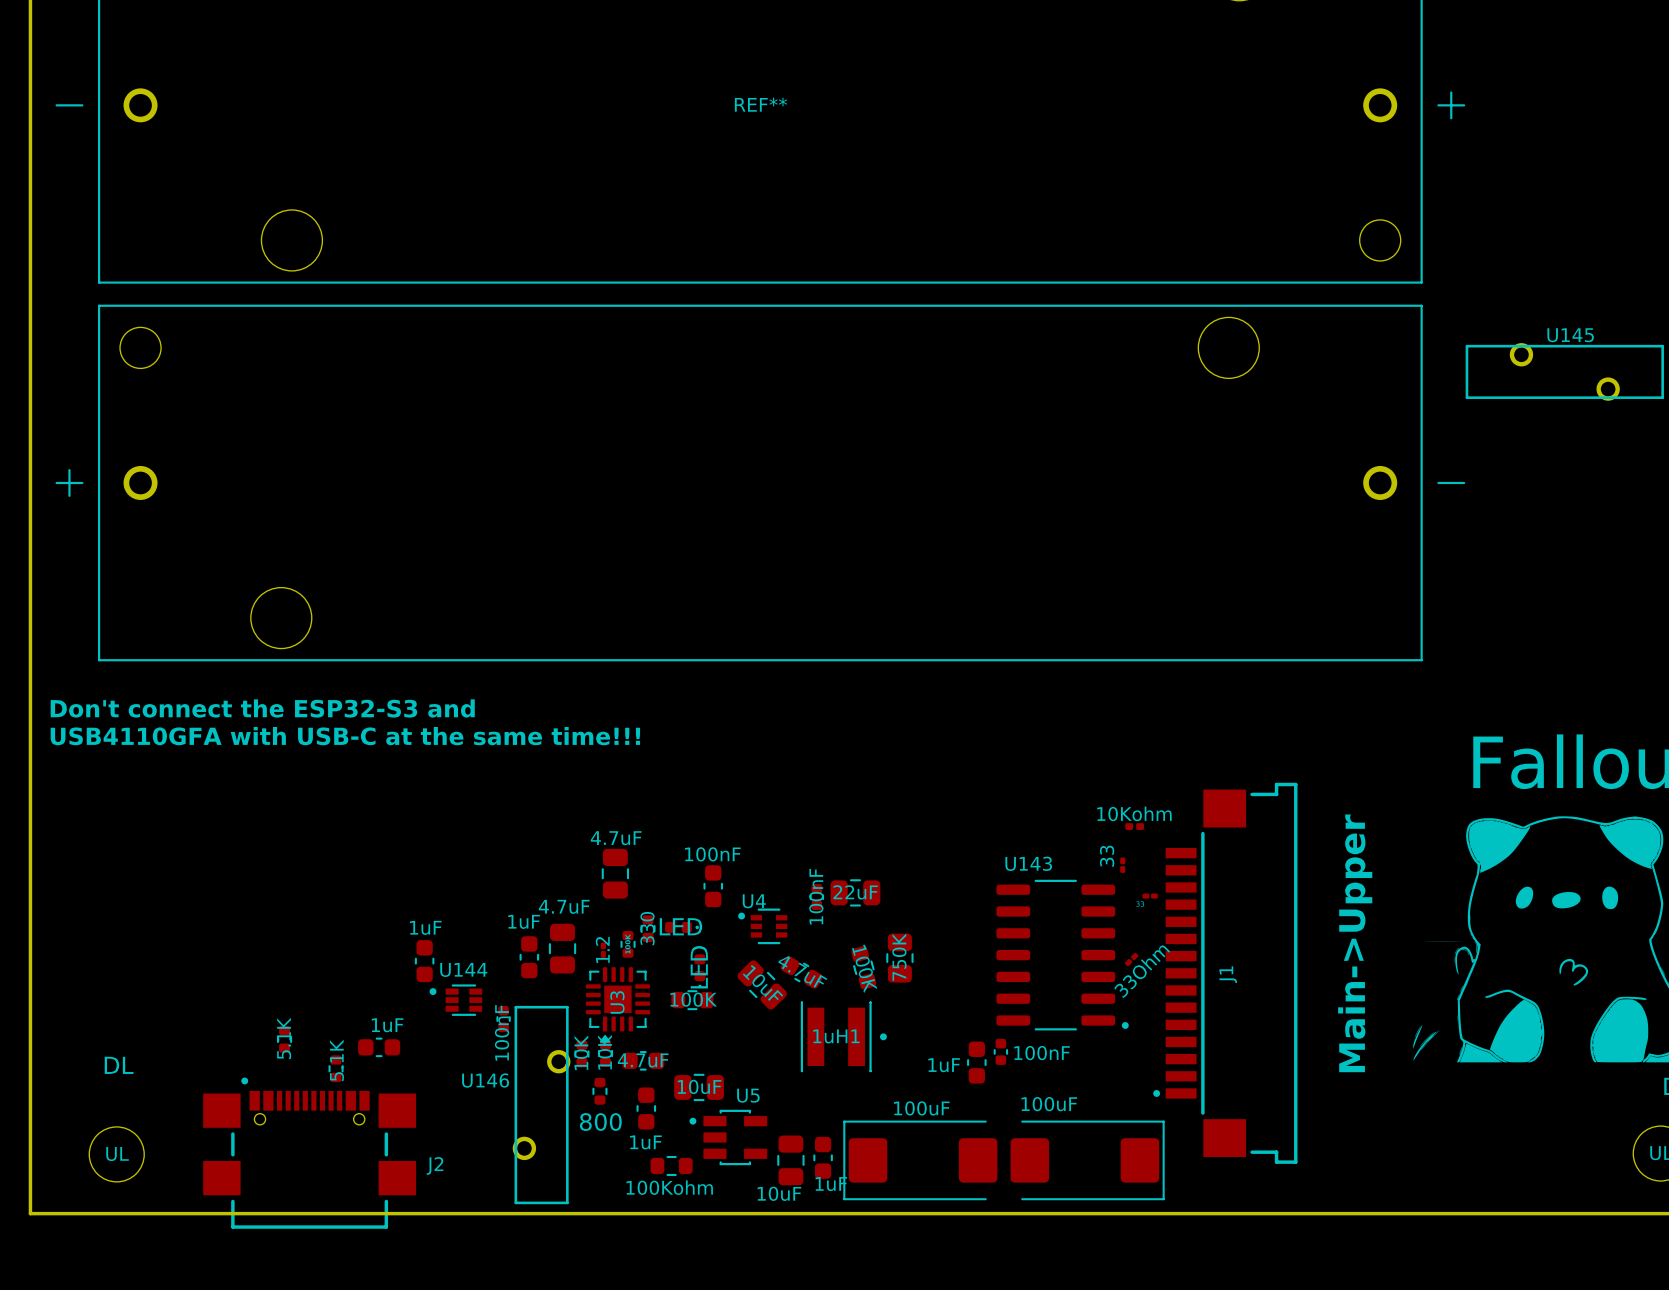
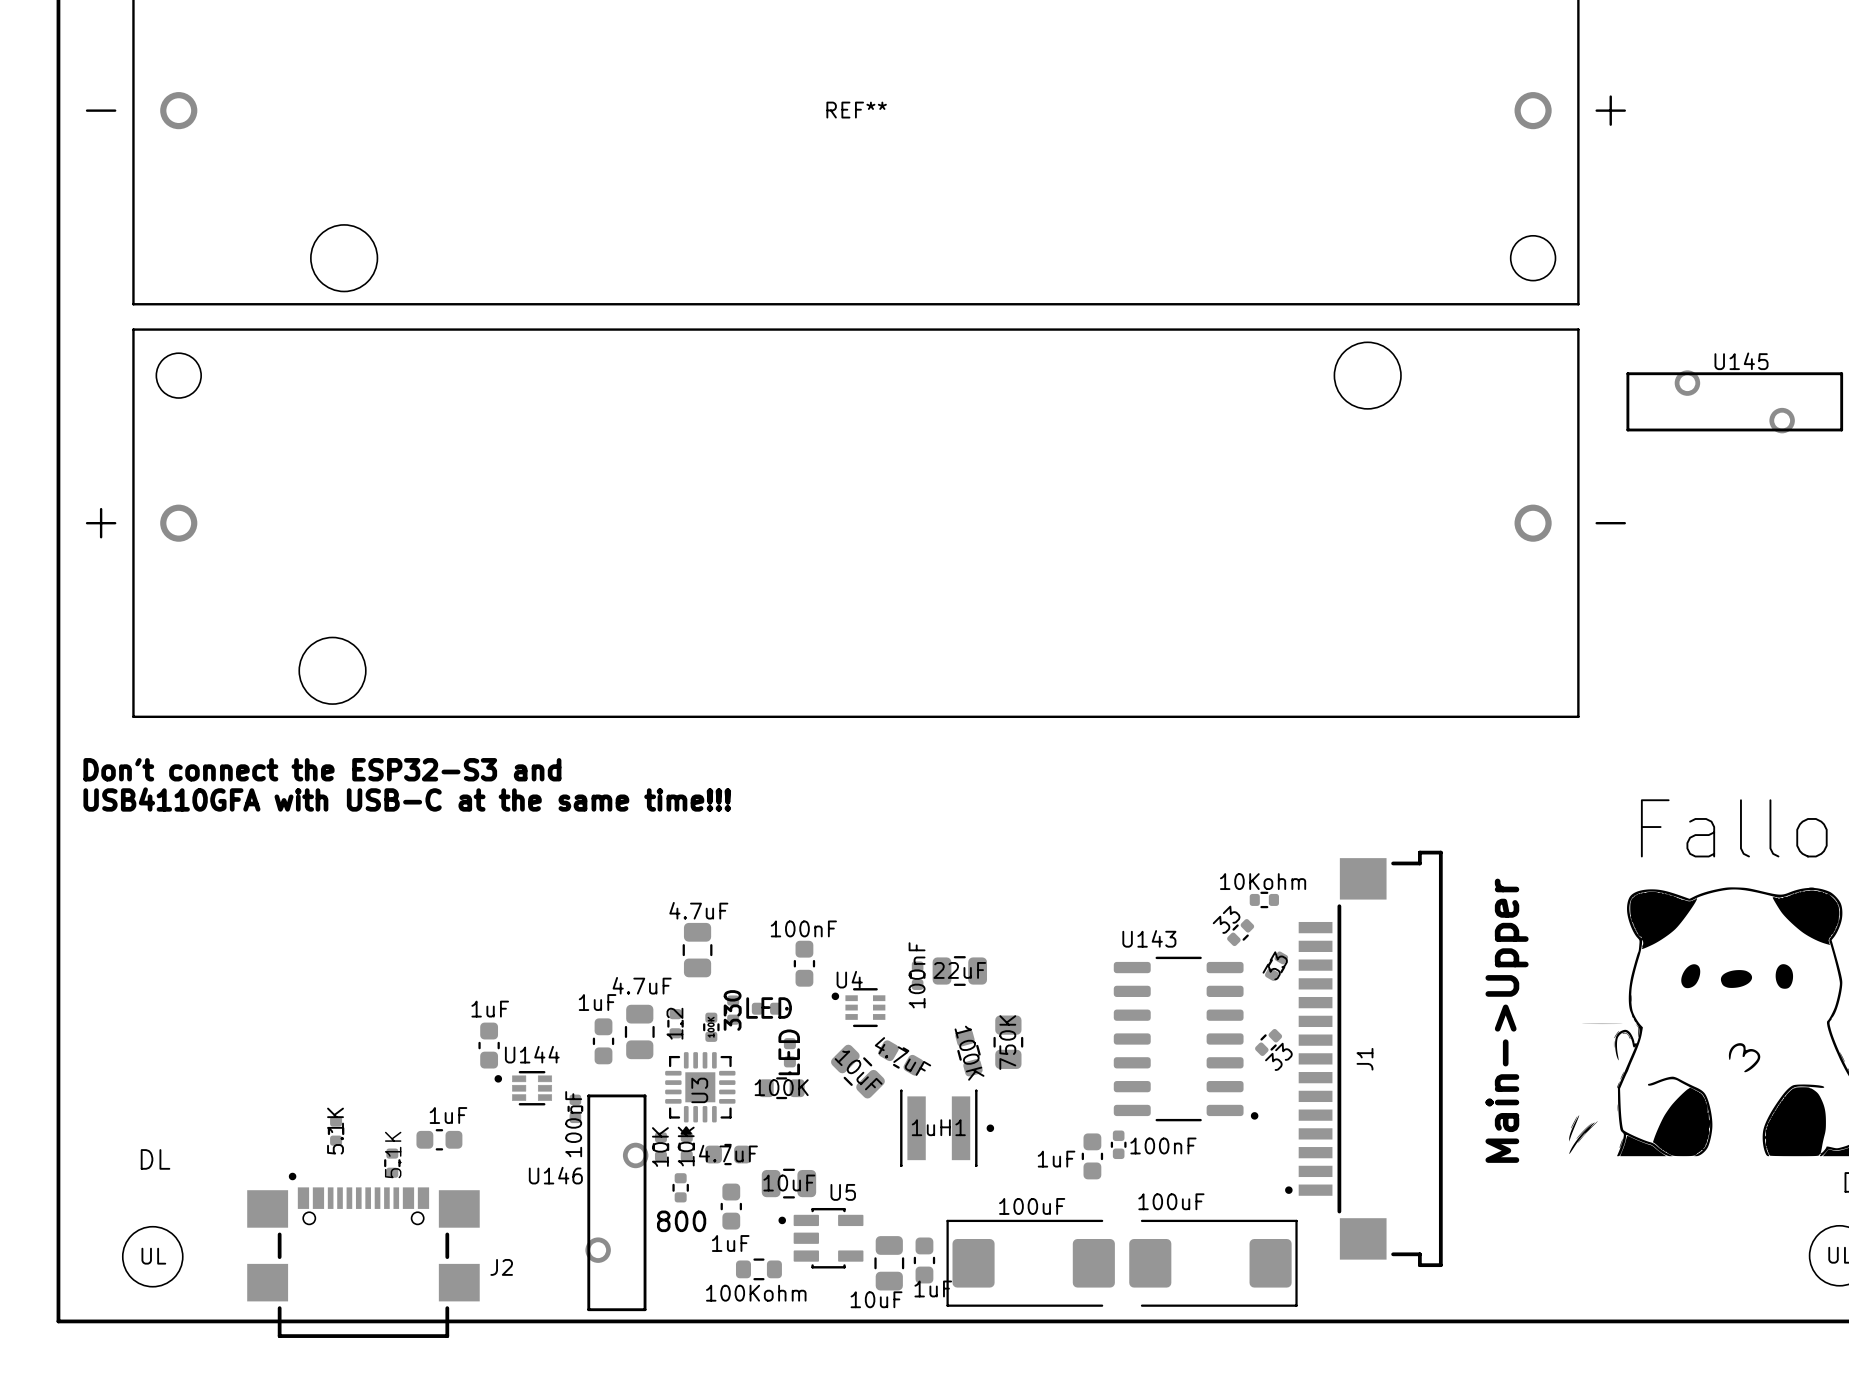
10Kohm footprint: [1125, 823, 1145, 830] -> [1249, 891, 1279, 909]
33: none -> (1240, 932)
part: (1122, 865) -> none
33: none -> (1276, 966)
part: (1150, 896) -> none
1.2 footprint: [600, 942, 606, 958] -> [667, 1009, 684, 1039]
33: none -> (1268, 1042)
33Ohm: (1131, 959) -> none

